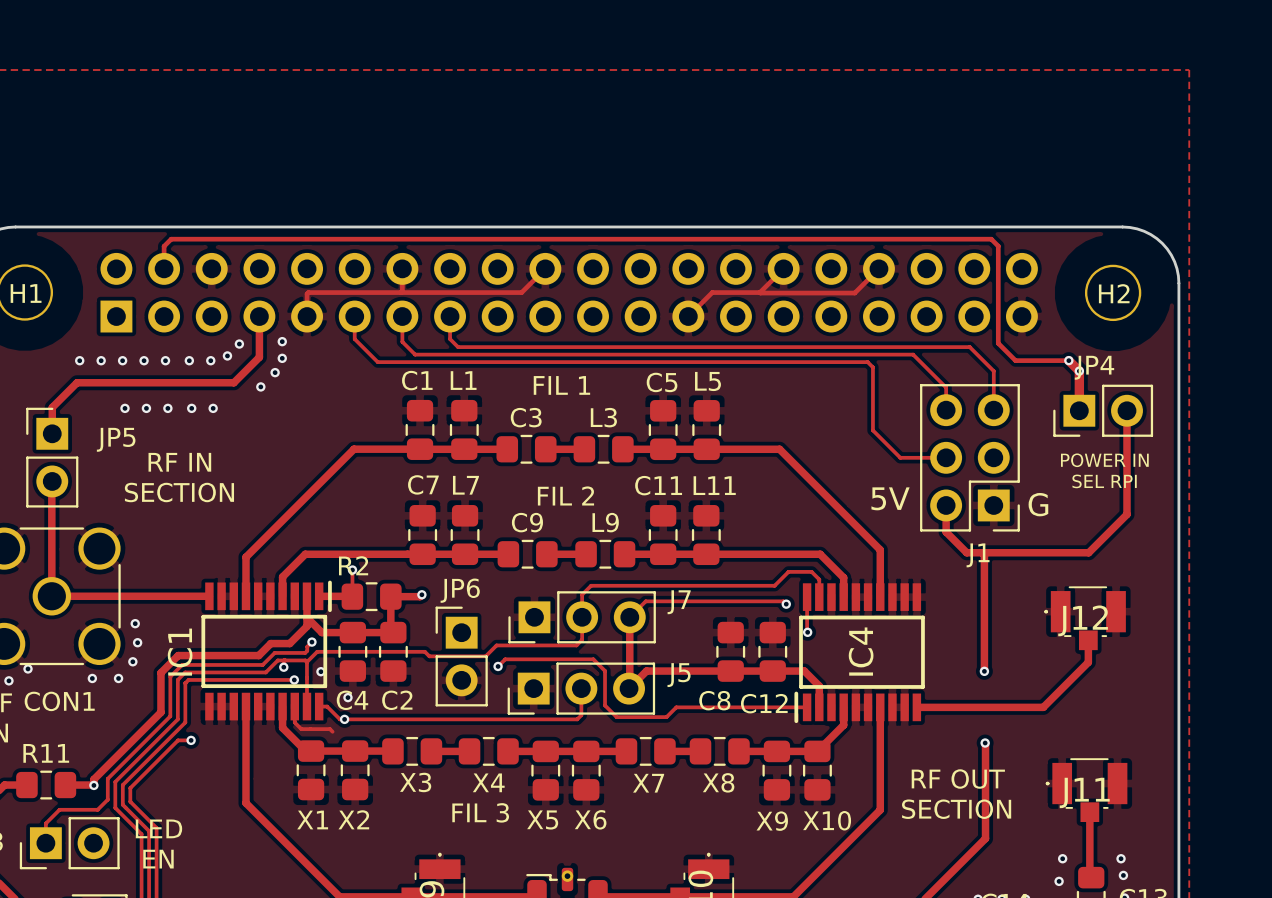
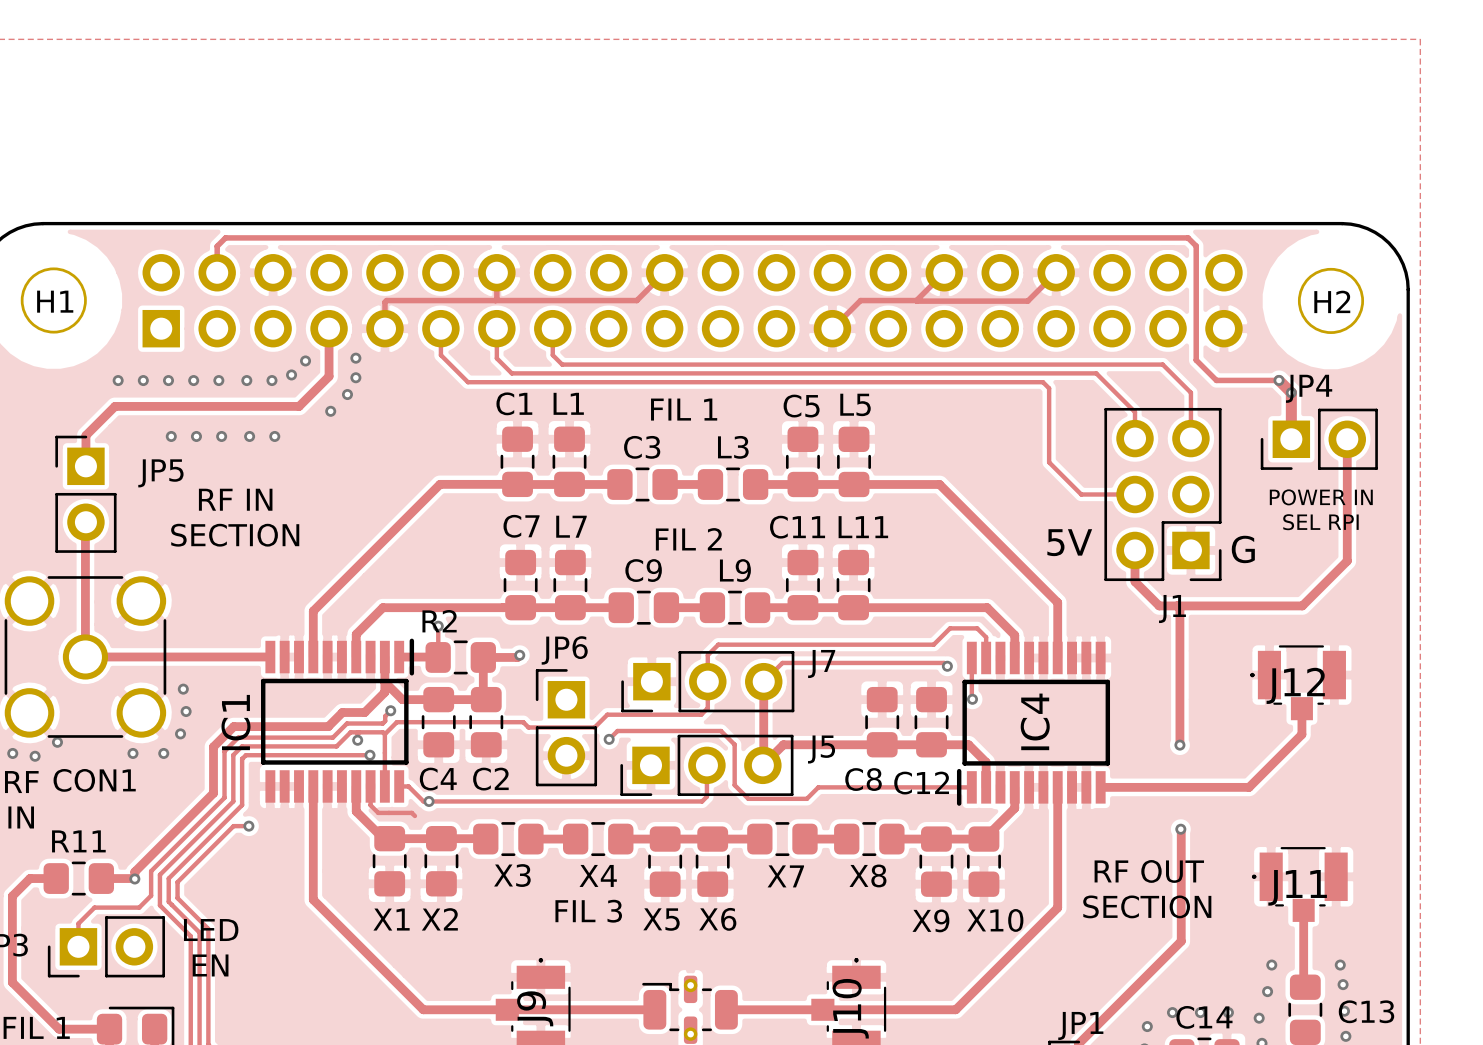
via: (320, 671) -> none
via: (347, 697) -> none

